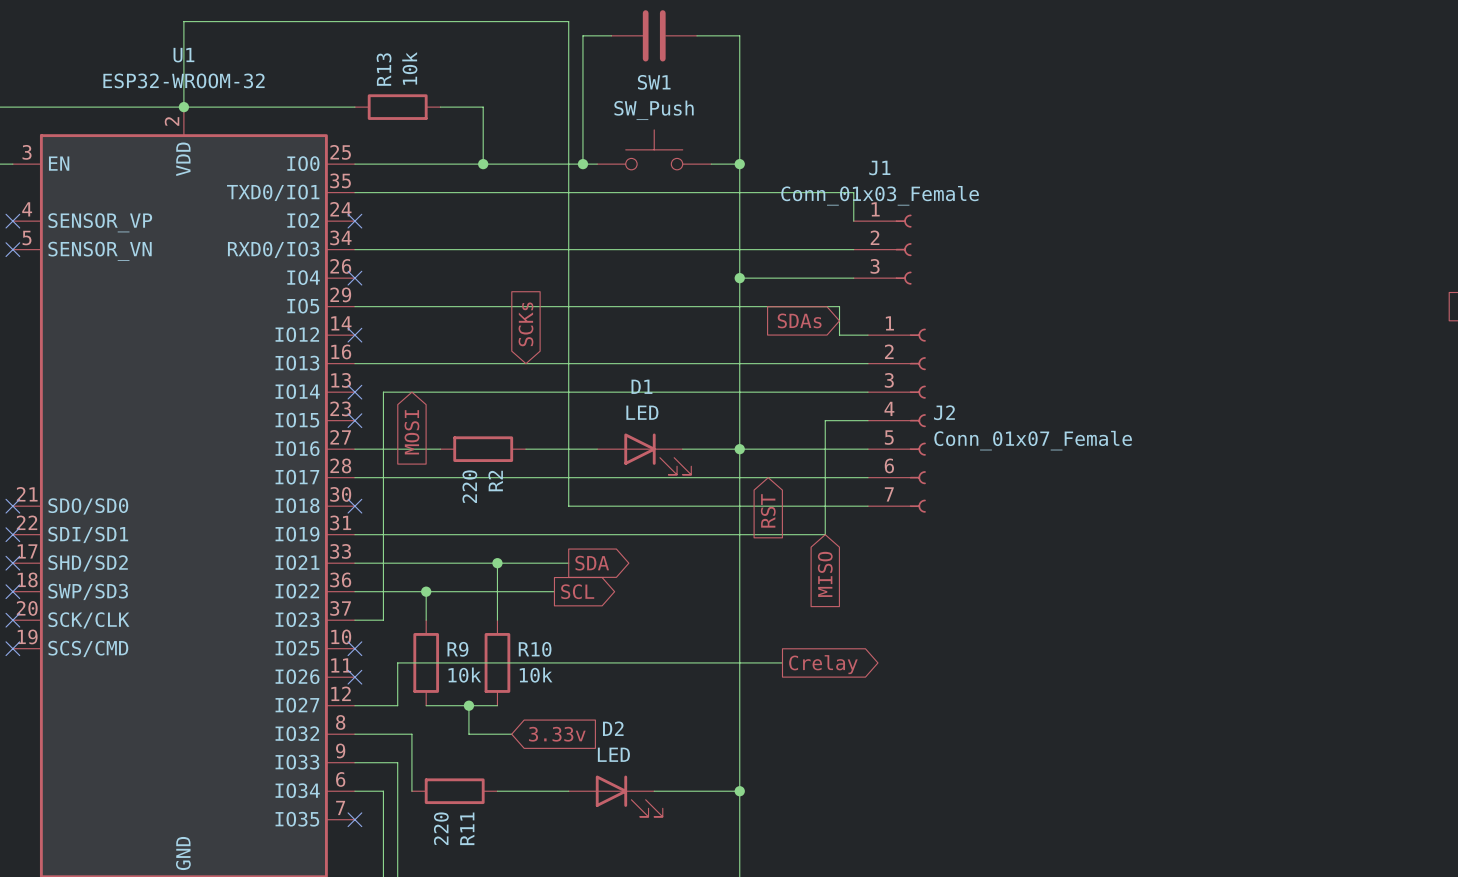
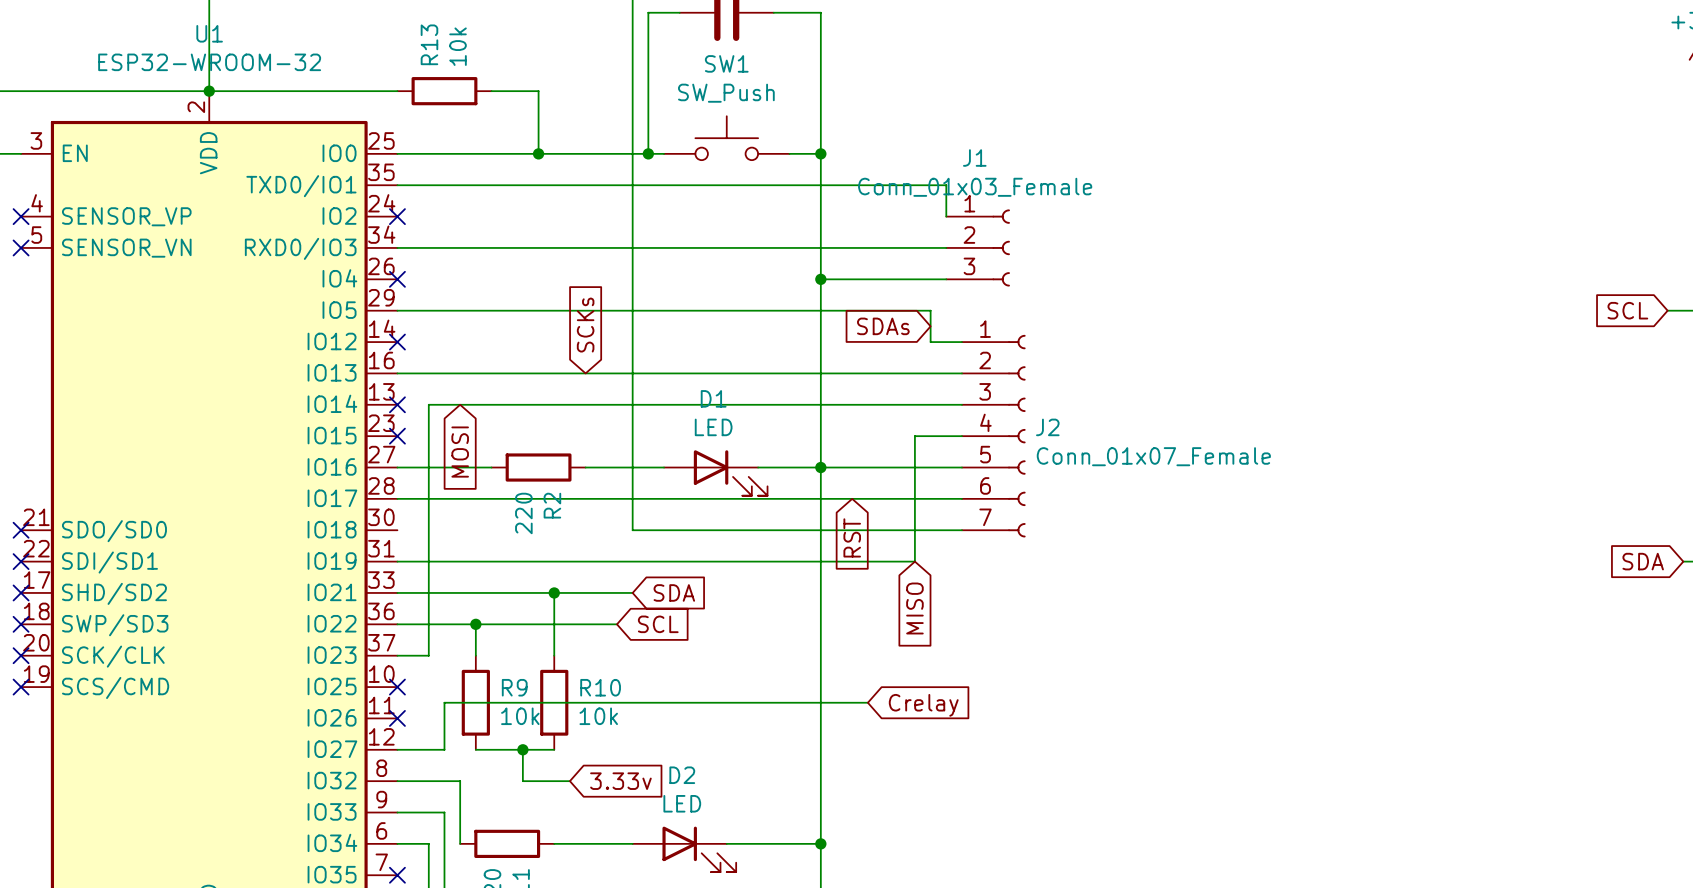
no-connect mark: (354, 506) -> none
global label shape: output (592, 563) -> input (674, 592)
global label shape: output (577, 591) -> input (658, 624)
global label shape: output (823, 664) -> input (923, 705)

